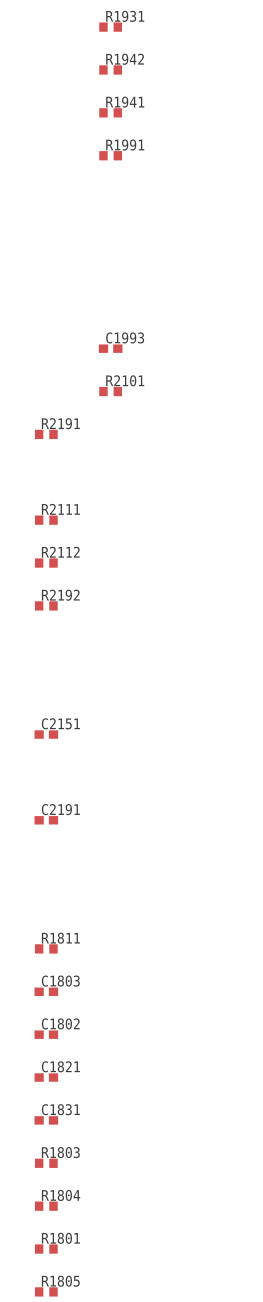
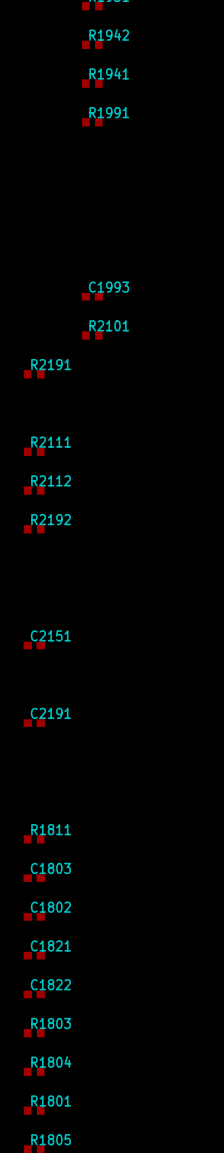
C1831 name: C1831 (60, 1109) -> C1822 (50, 984)

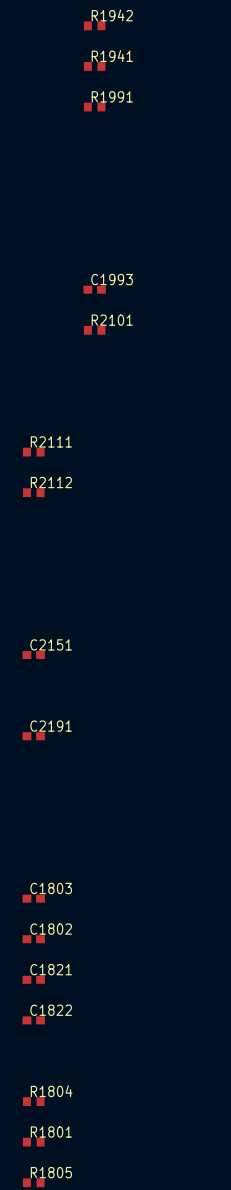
R2191: (34, 374) -> none
R2192: (34, 529) -> none
R1811: (34, 839) -> none
R1803: (34, 1033) -> none

